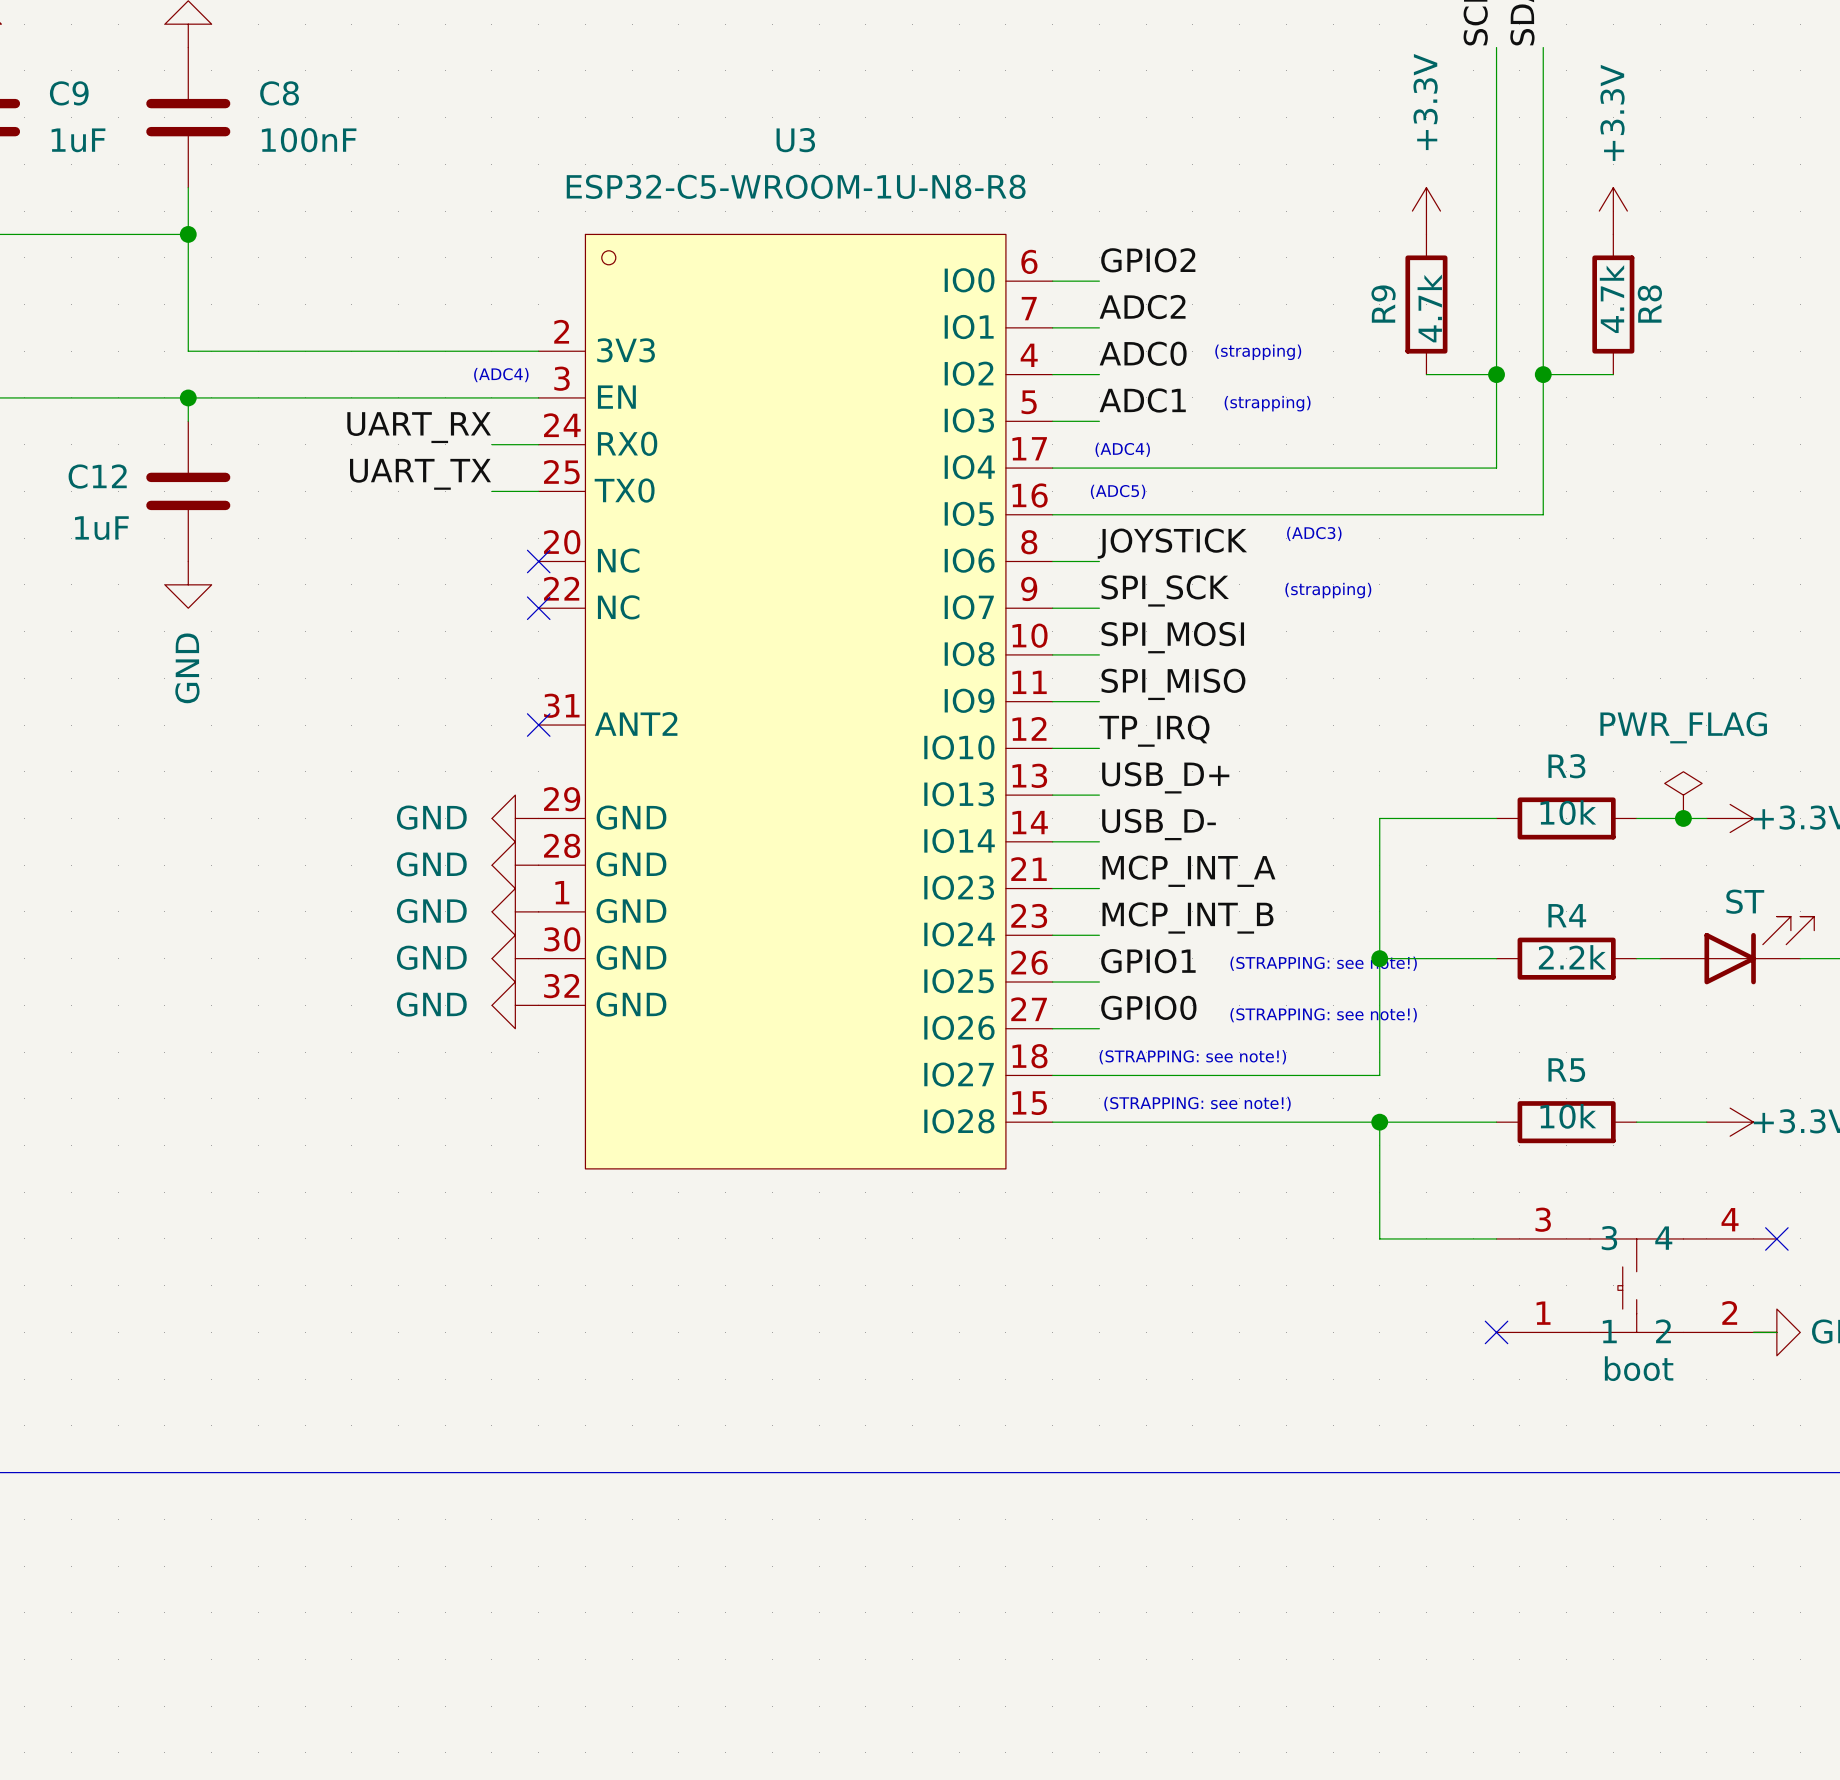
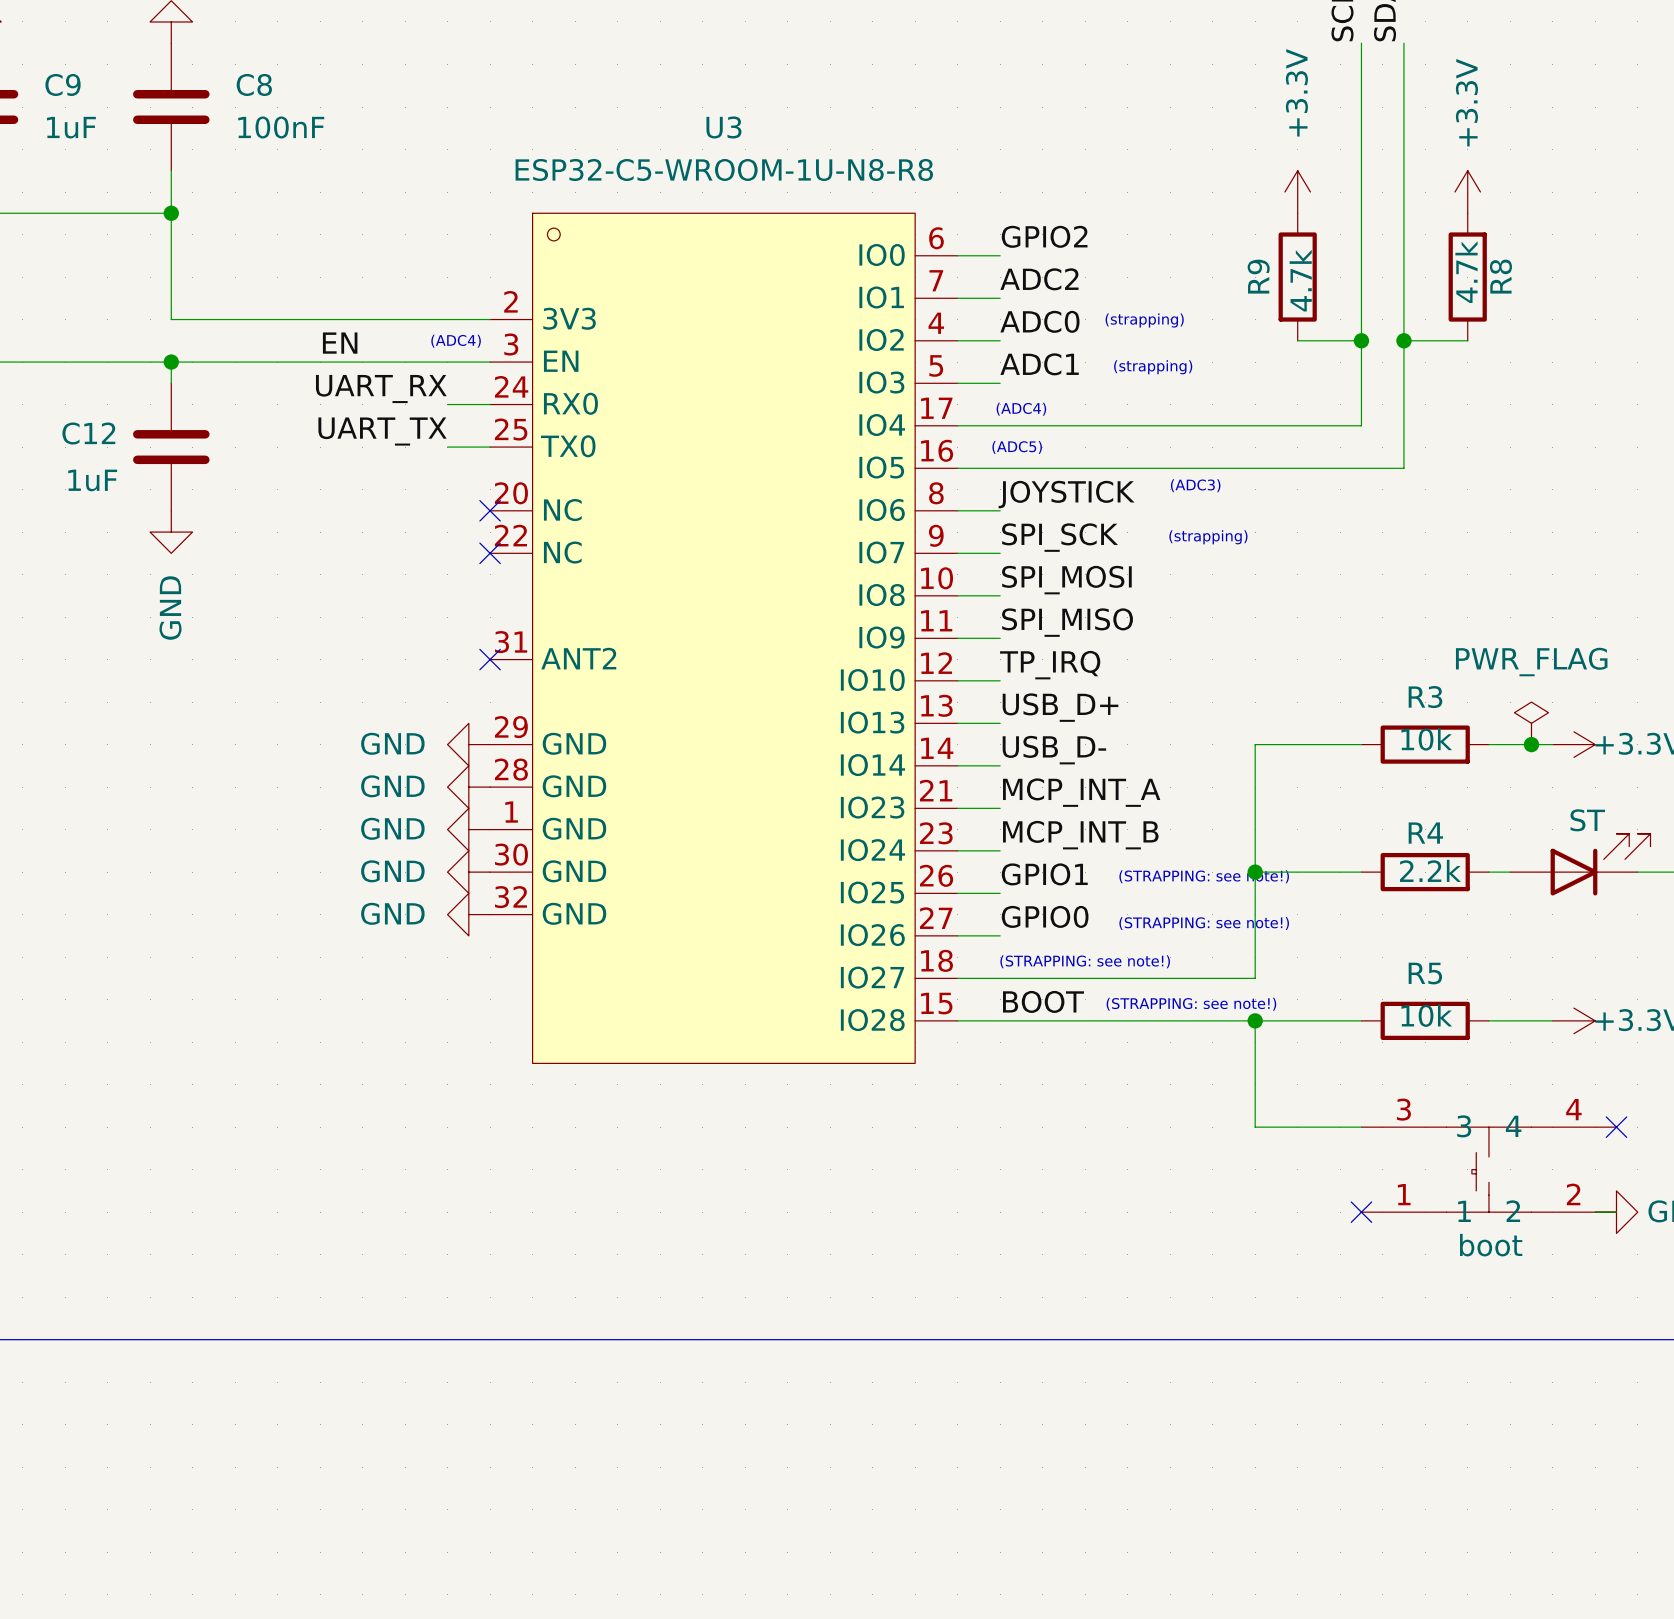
label: none -> EN (340, 343)
label: none -> BOOT (1043, 1001)
text position: (STRAPPING: see note!) (1197, 1103) -> (STRAPPING: see note!) (1191, 1004)

